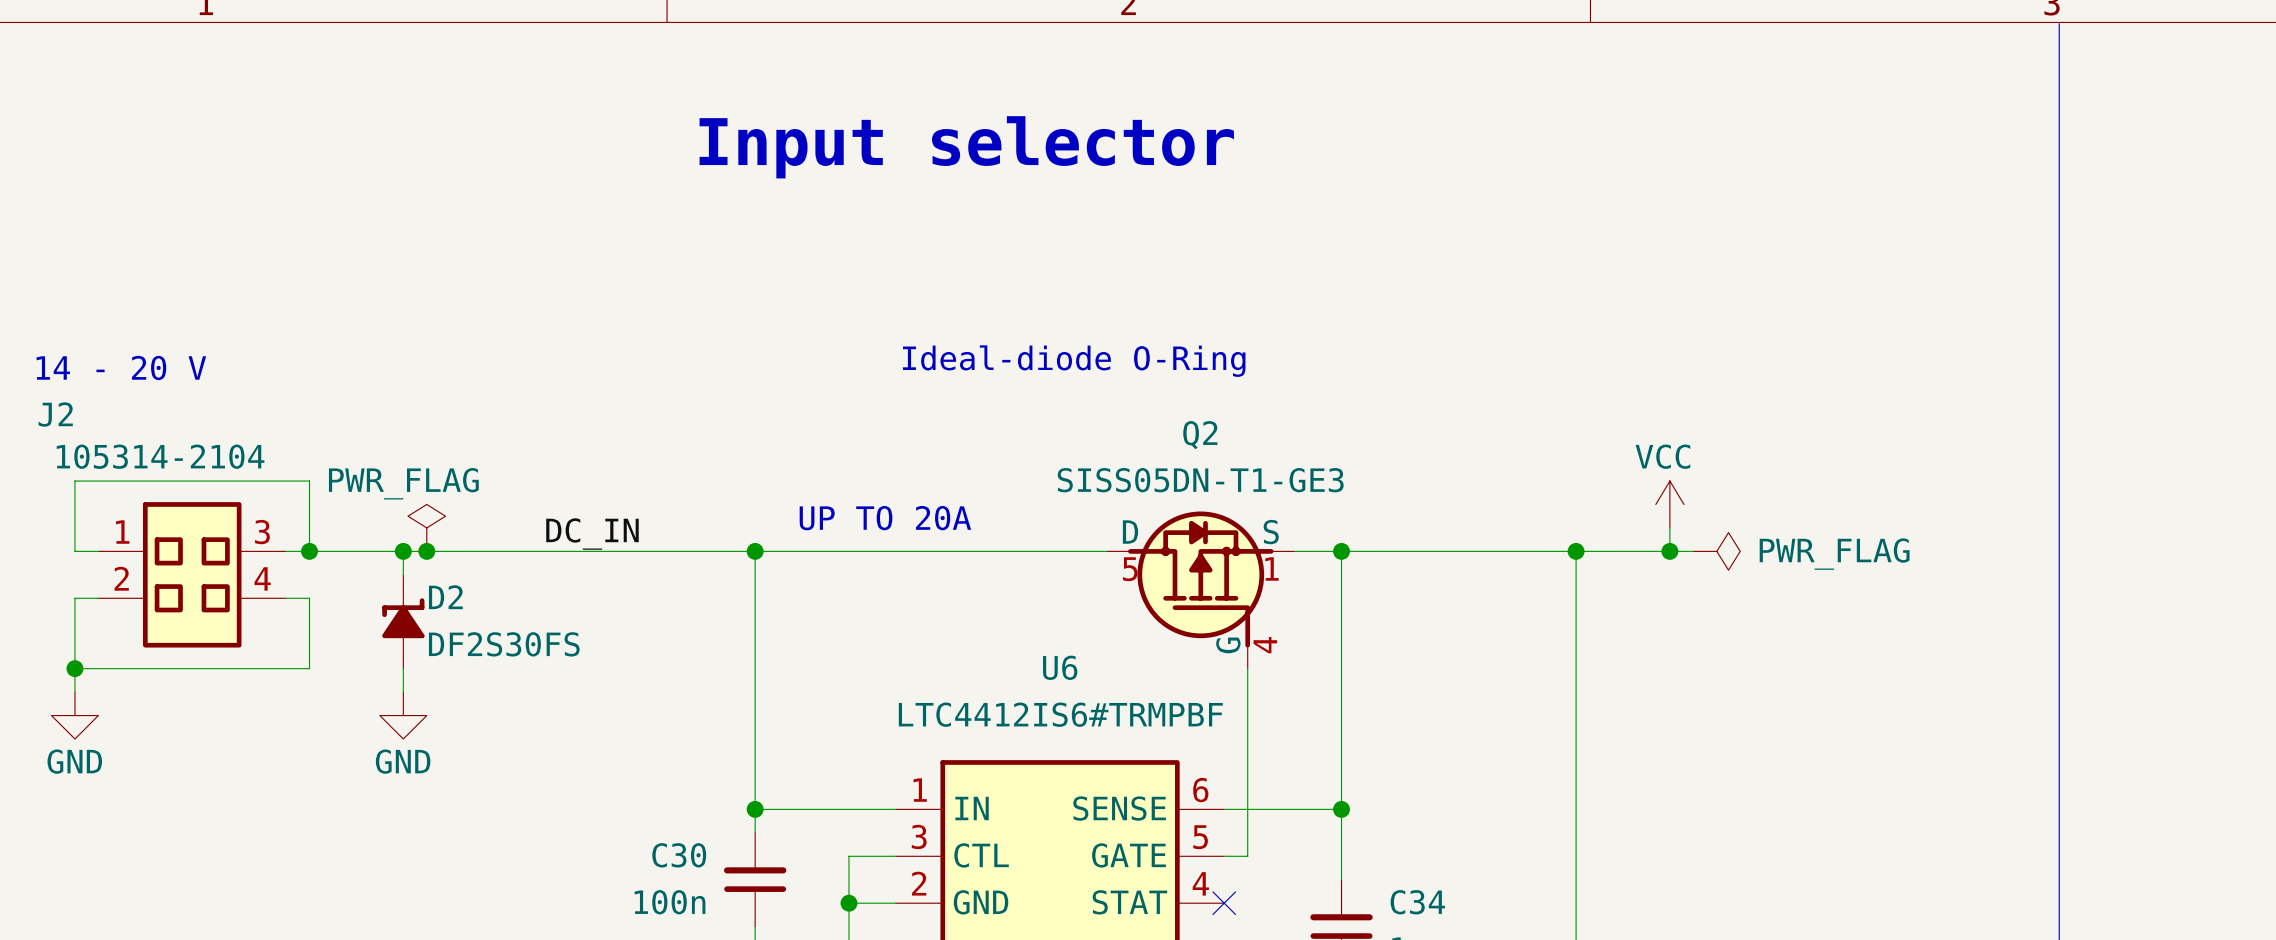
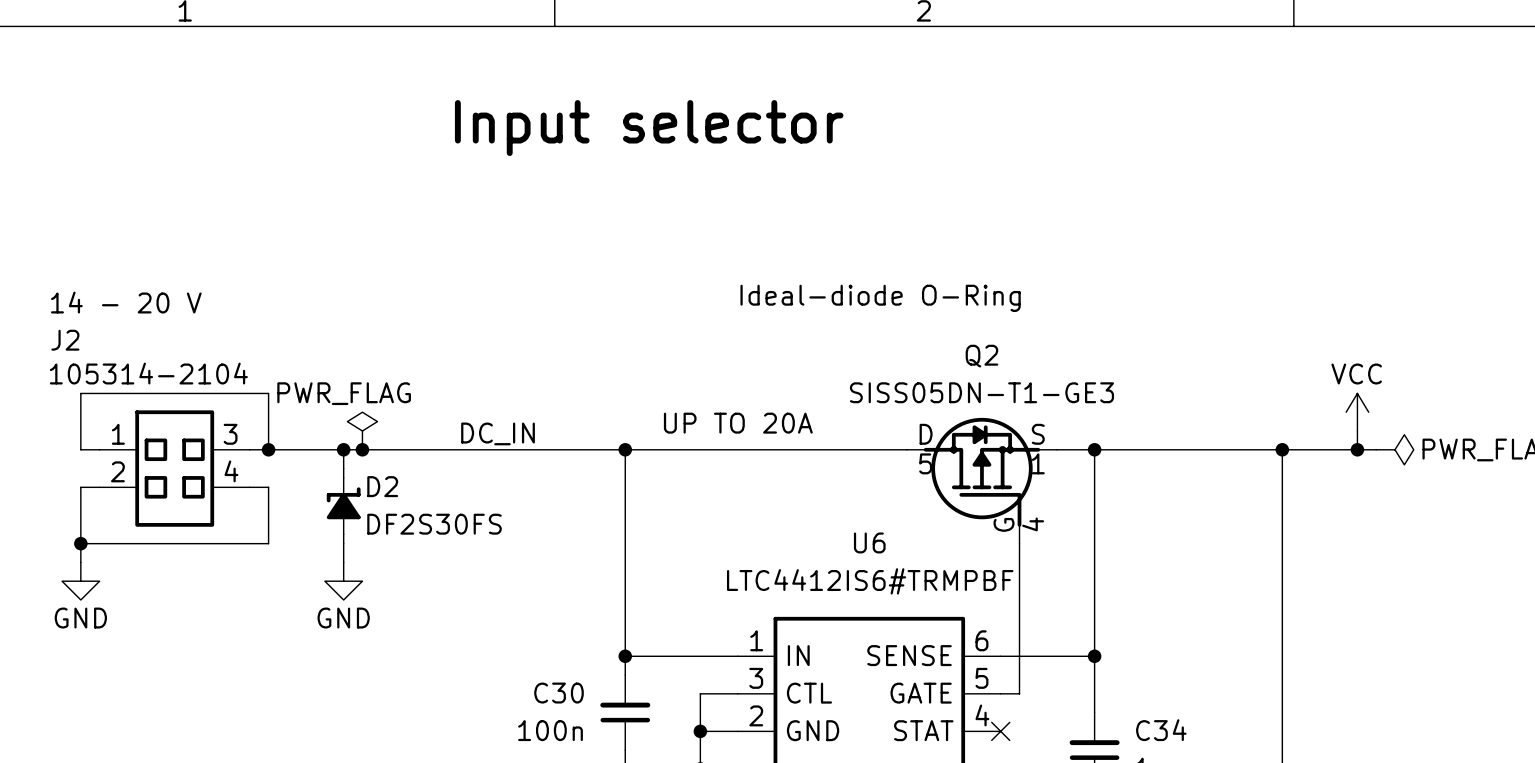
text position: Input selector (966, 147) -> Input selector (649, 128)

